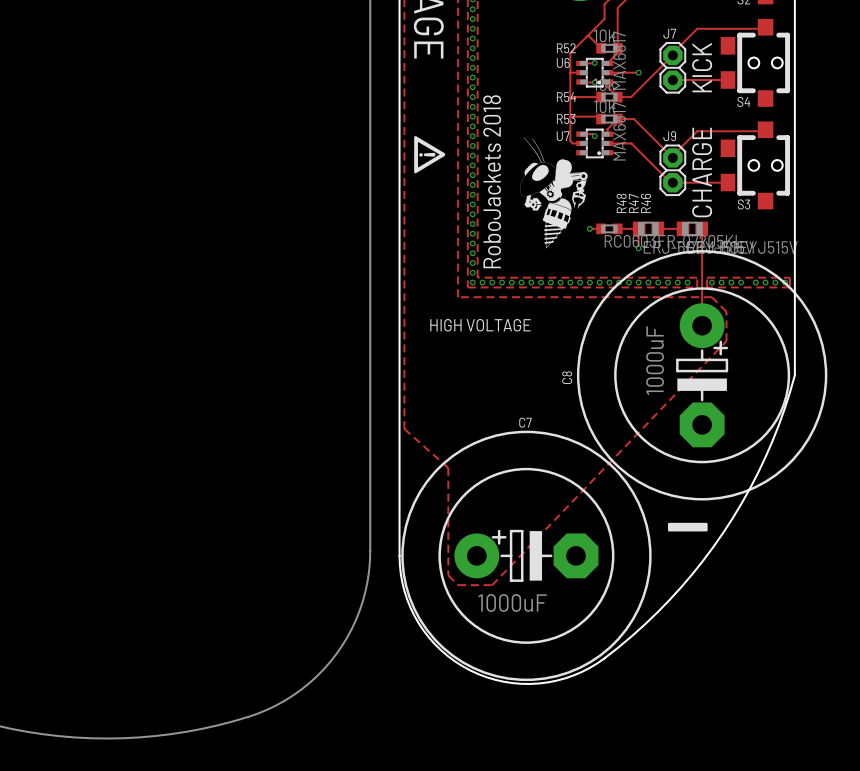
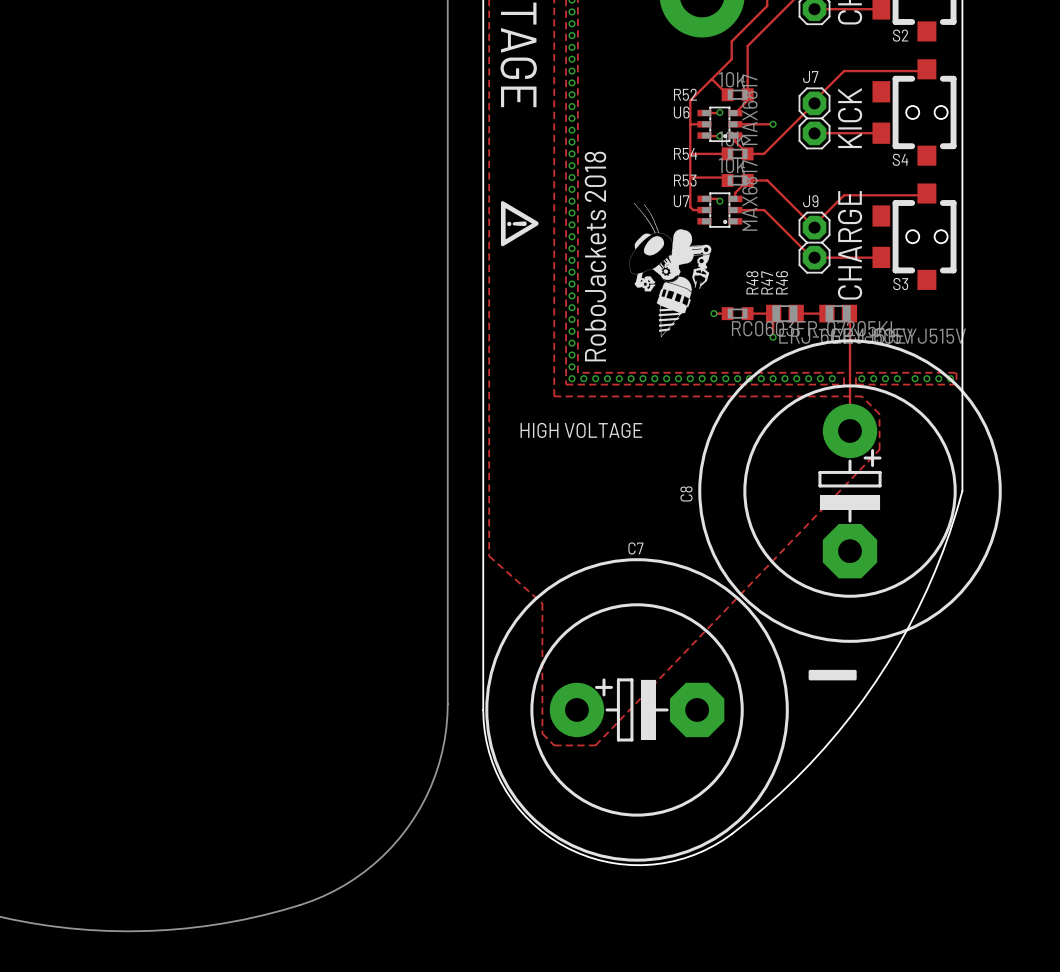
C8 value: 1000uF (655, 360) -> none
C7 value: 1000uF (512, 602) -> none

